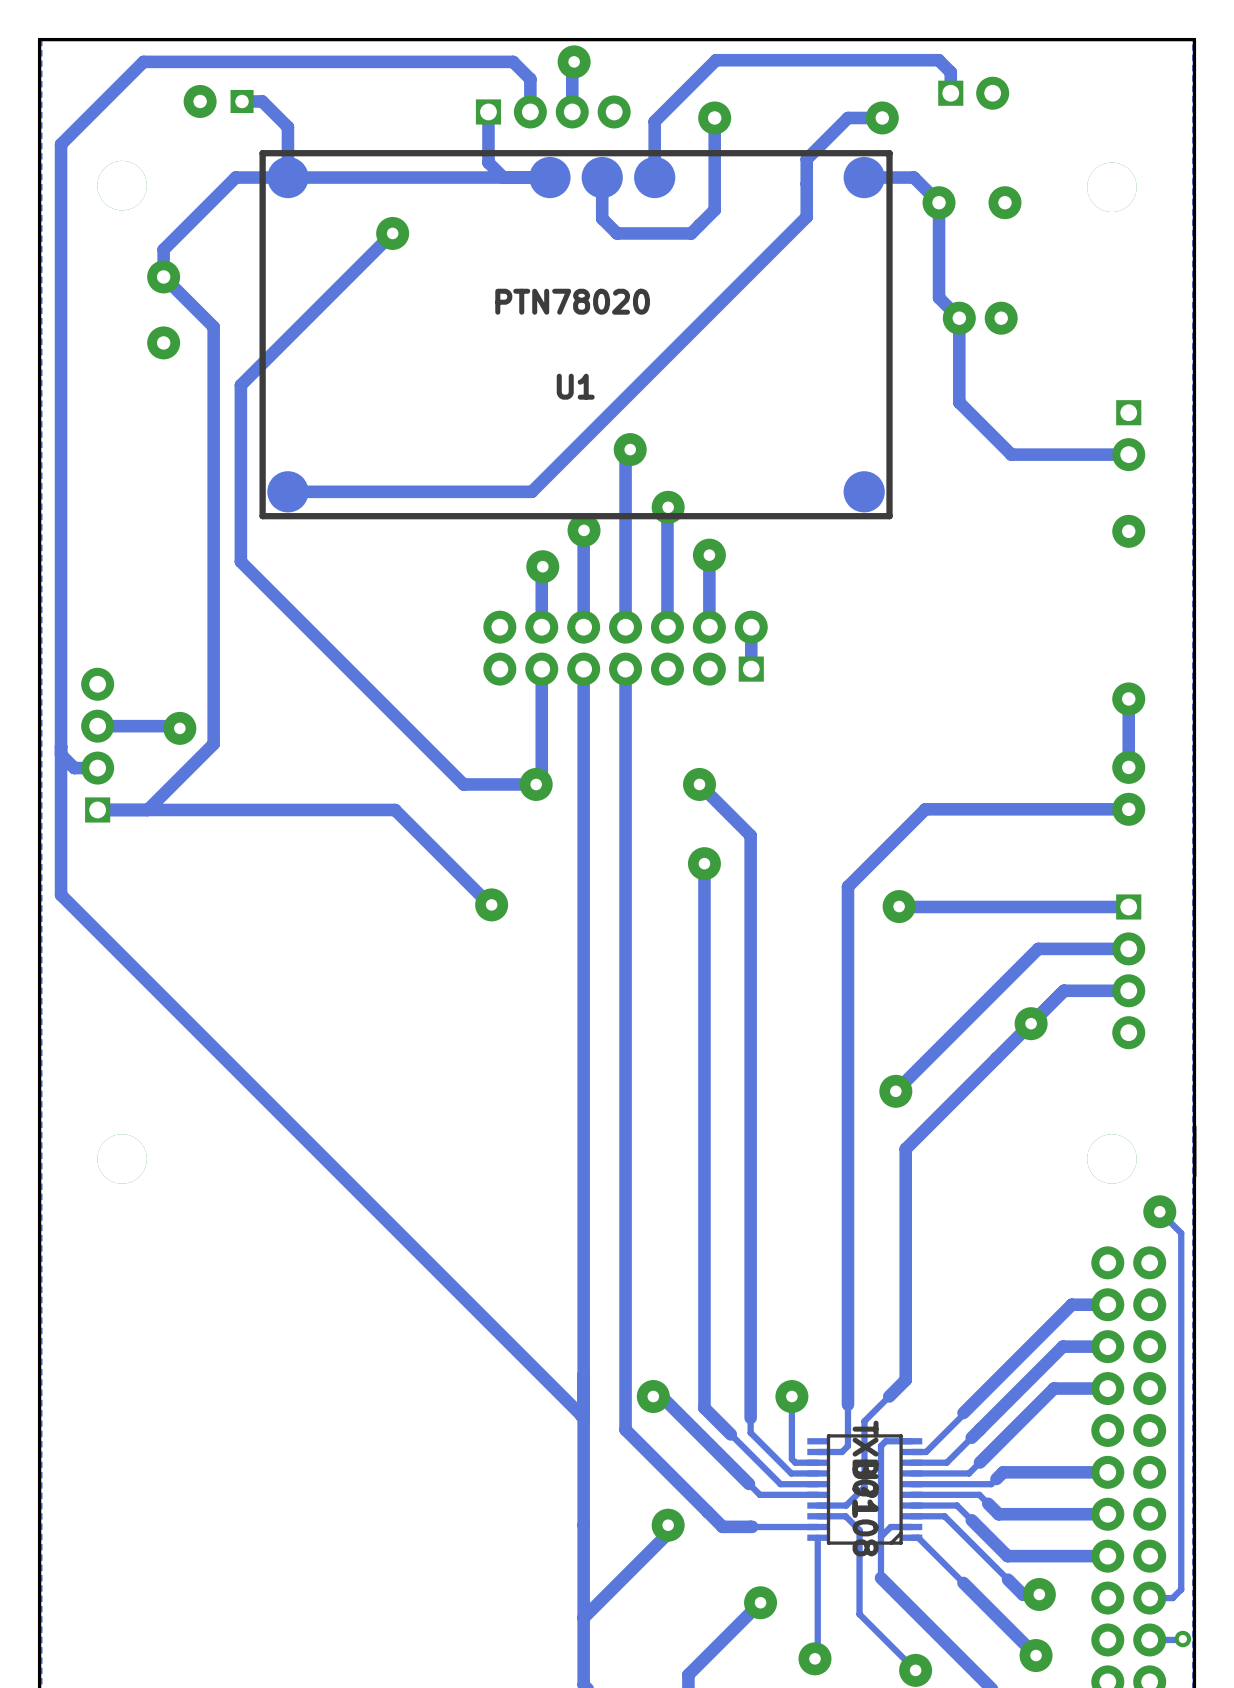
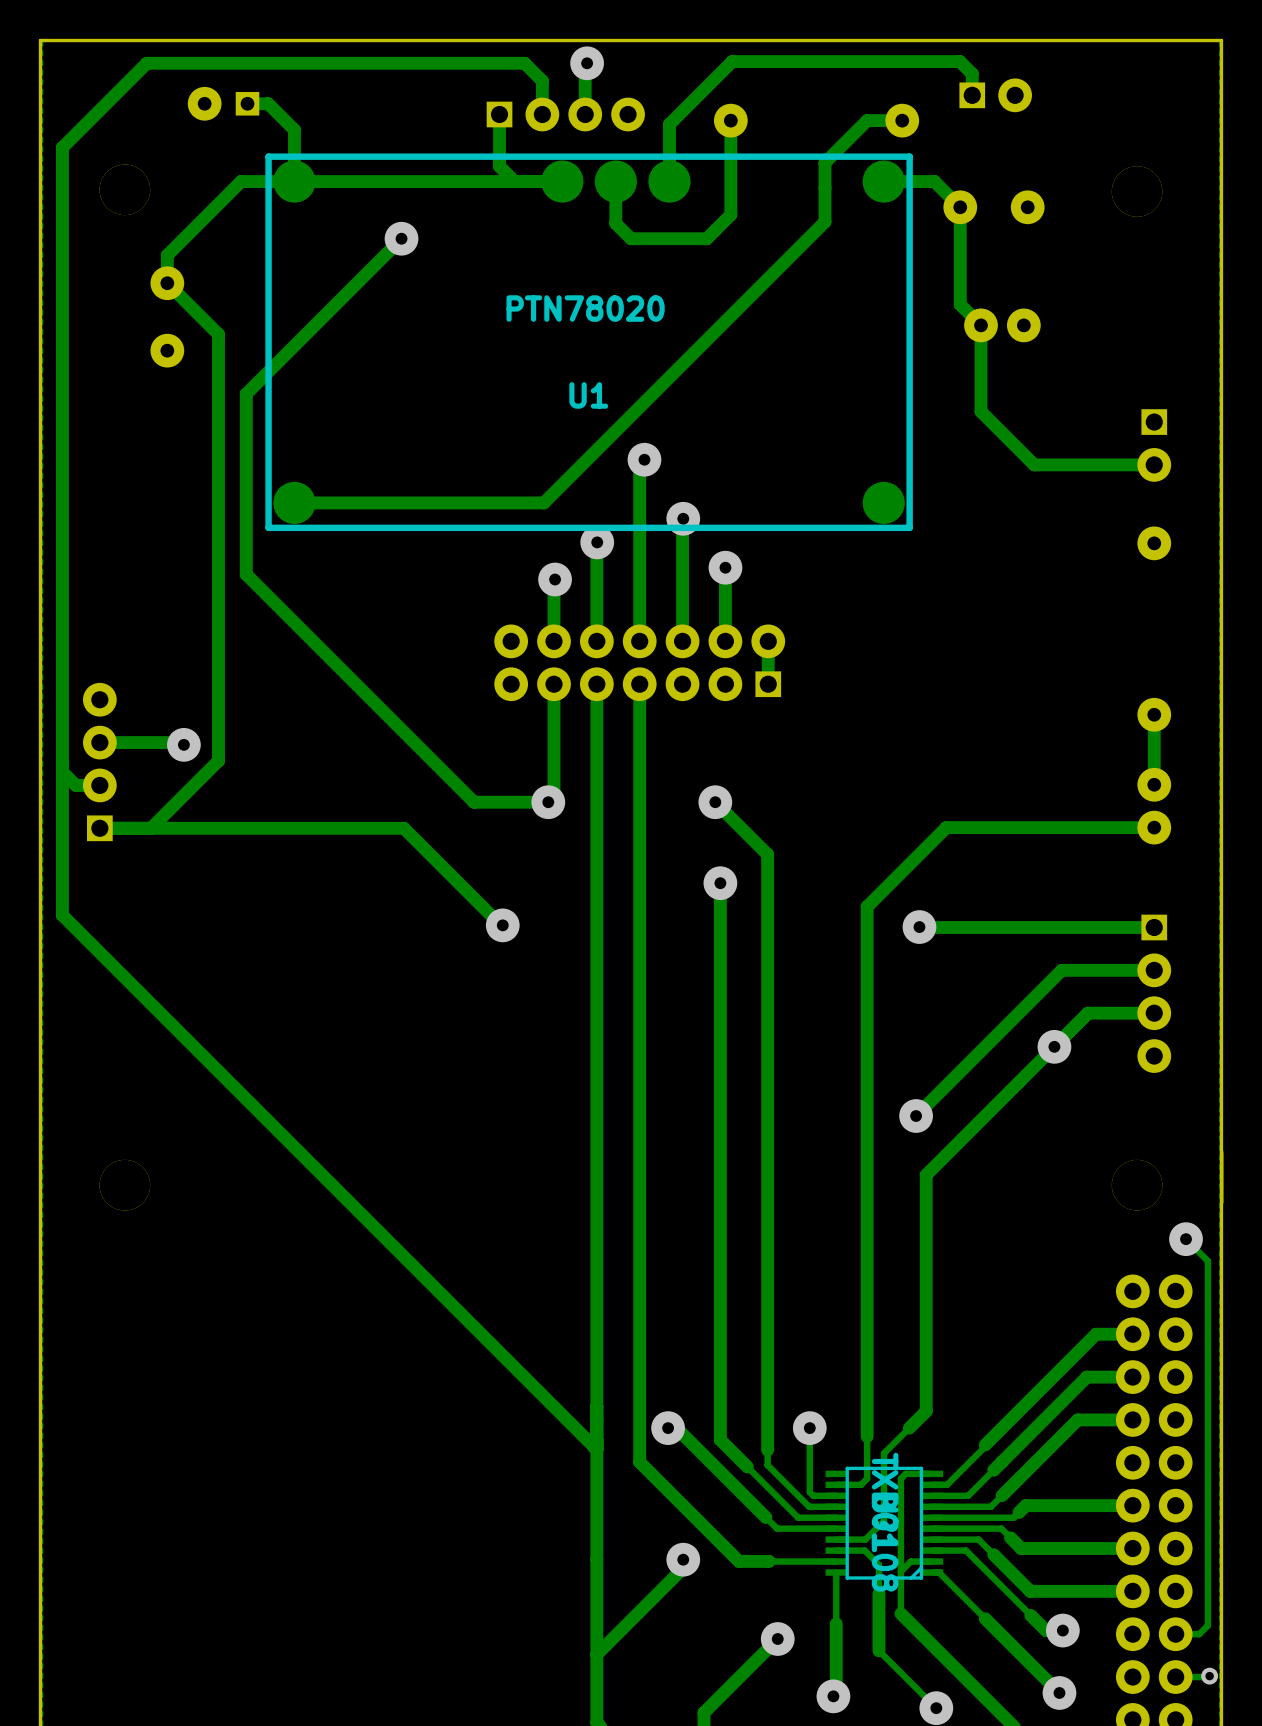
track width: thin (859, 1558) (859, 1614) -> thick (878, 1593) (878, 1650)
track width: thin (817, 1587) (817, 1656) -> thick (836, 1623) (836, 1693)

